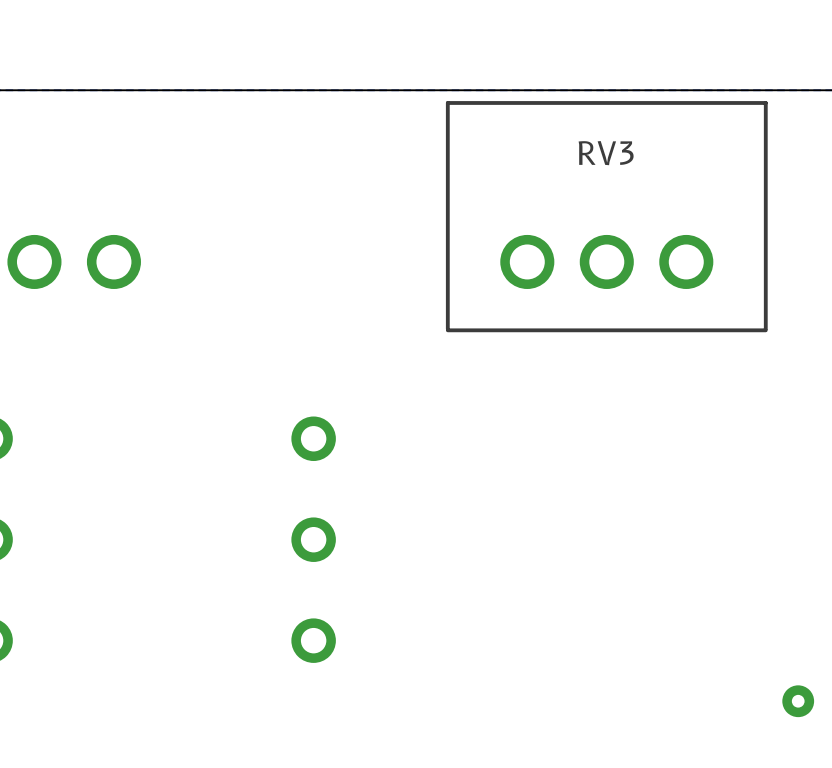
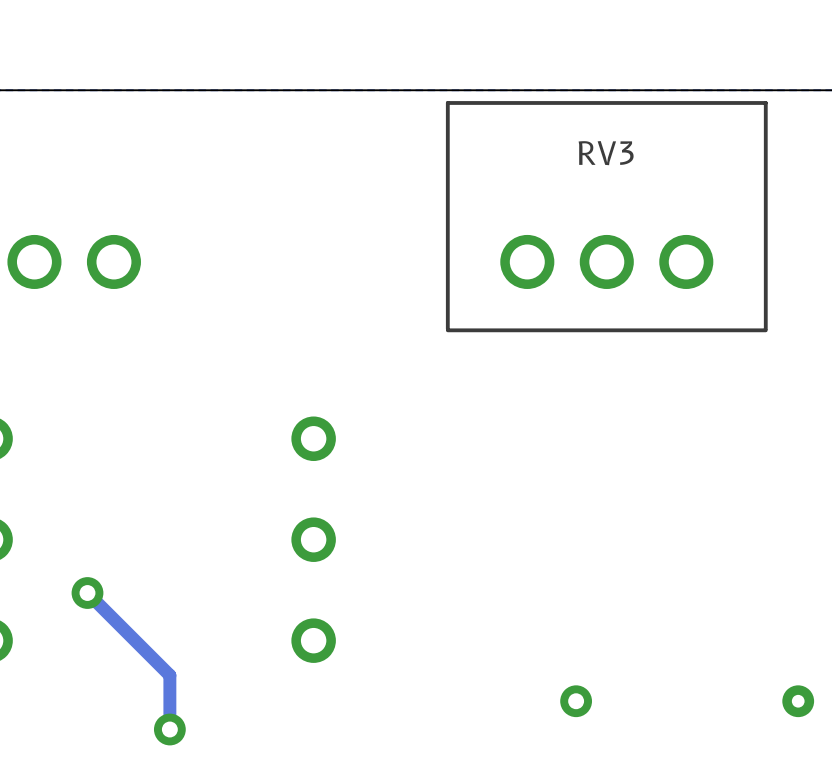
track: none -> (87, 593) (169, 675) (169, 729)
via: none -> (87, 593)
via: none -> (576, 701)
via: none -> (169, 729)

